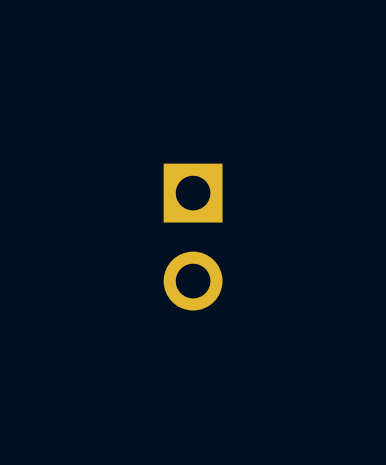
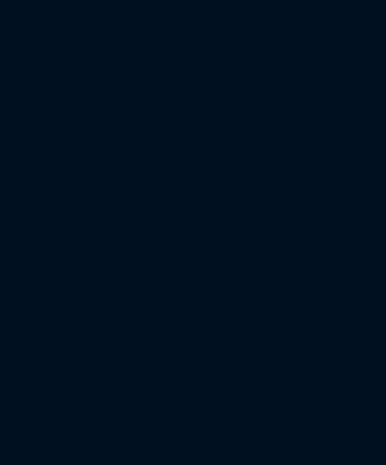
part: (193, 237) -> none

